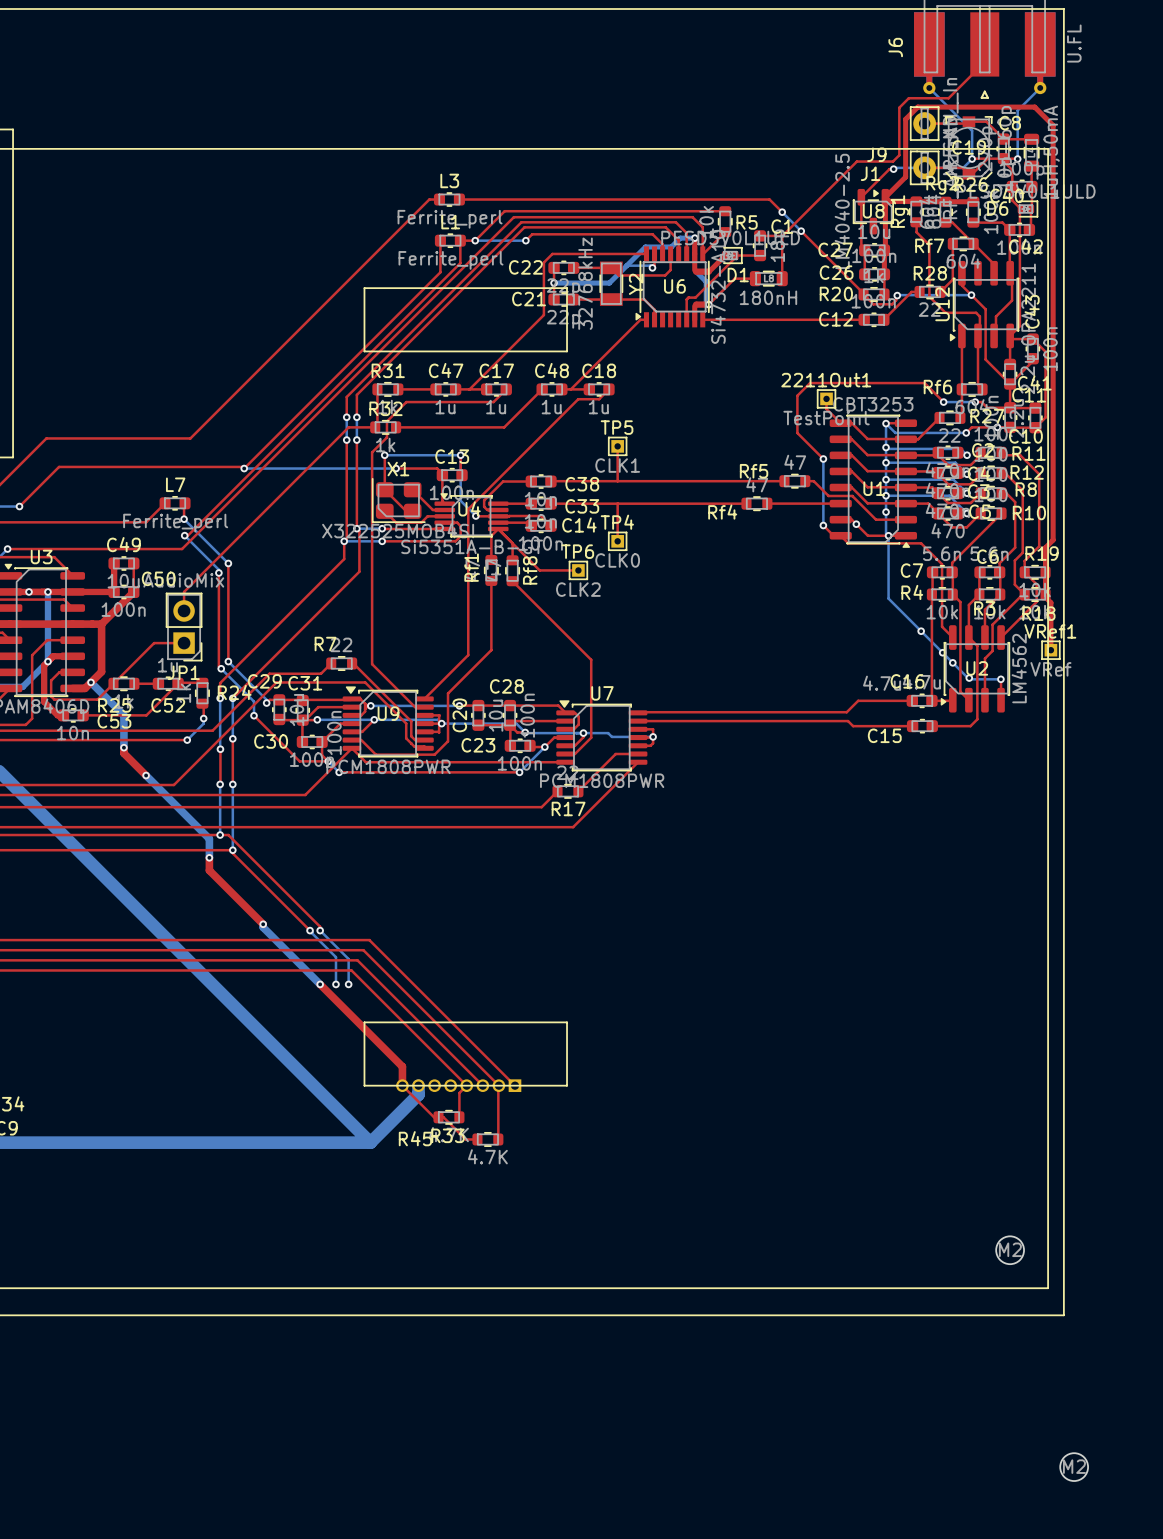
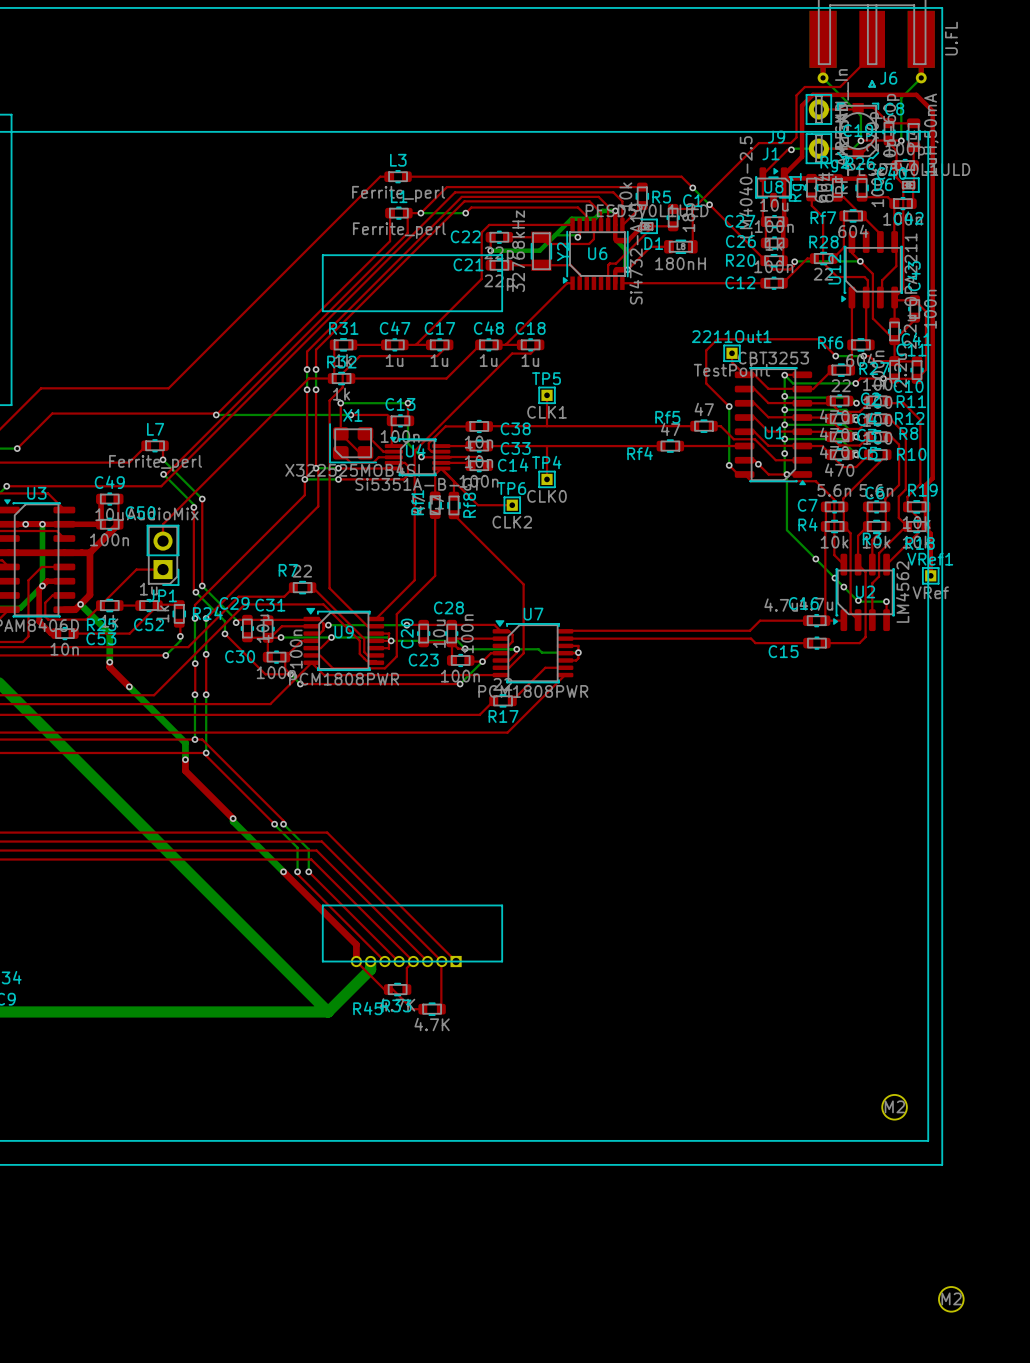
J6 name rotation: 0° (895, 47) -> 90° clockwise (888, 78)
J6 name position: J6 (895, 47) -> J6 (888, 78)
top track: none -> (308, 871) (398, 961)
top track: none -> (297, 874) (384, 961)

